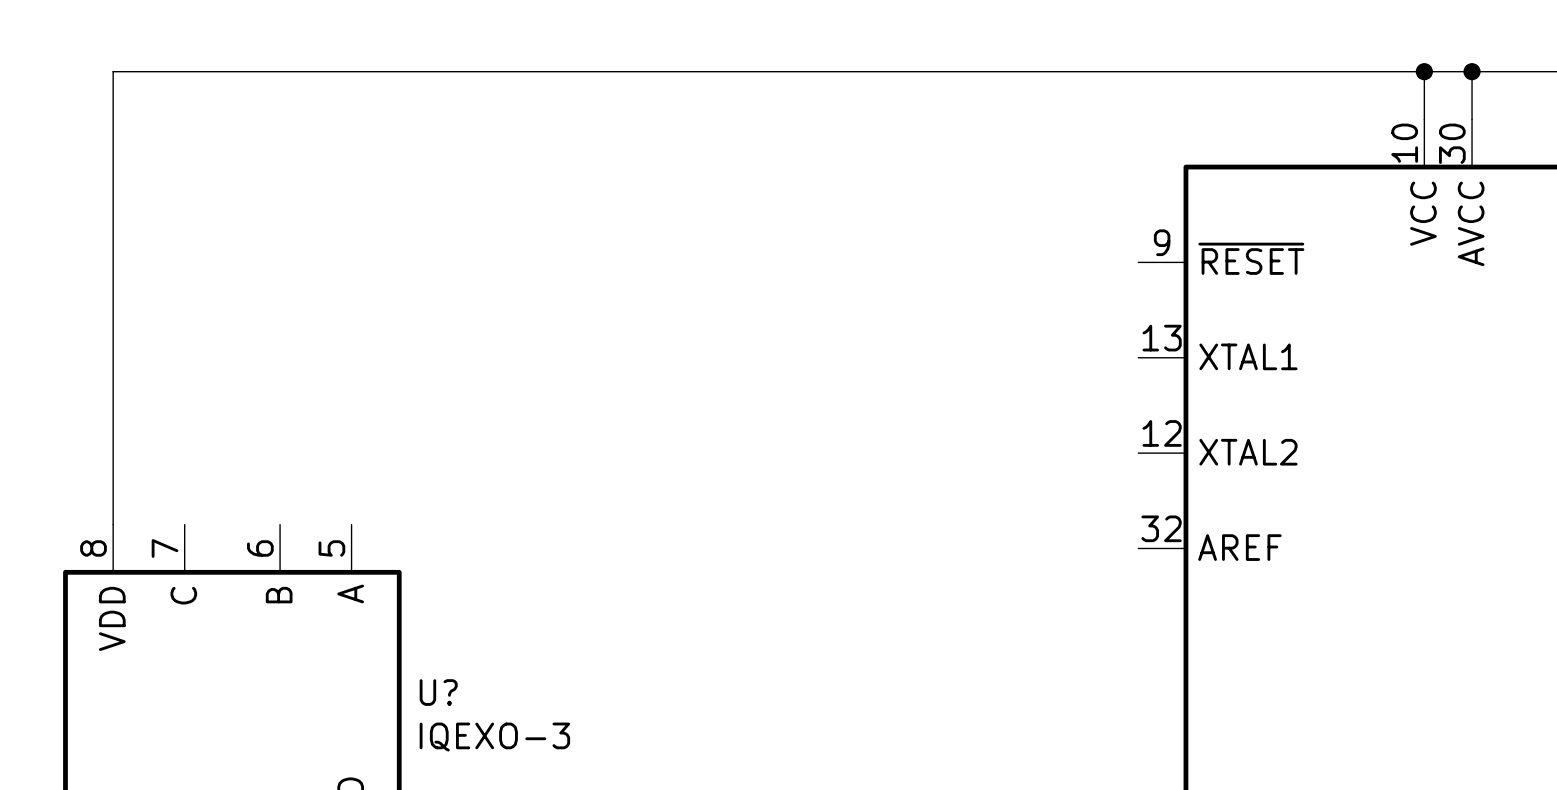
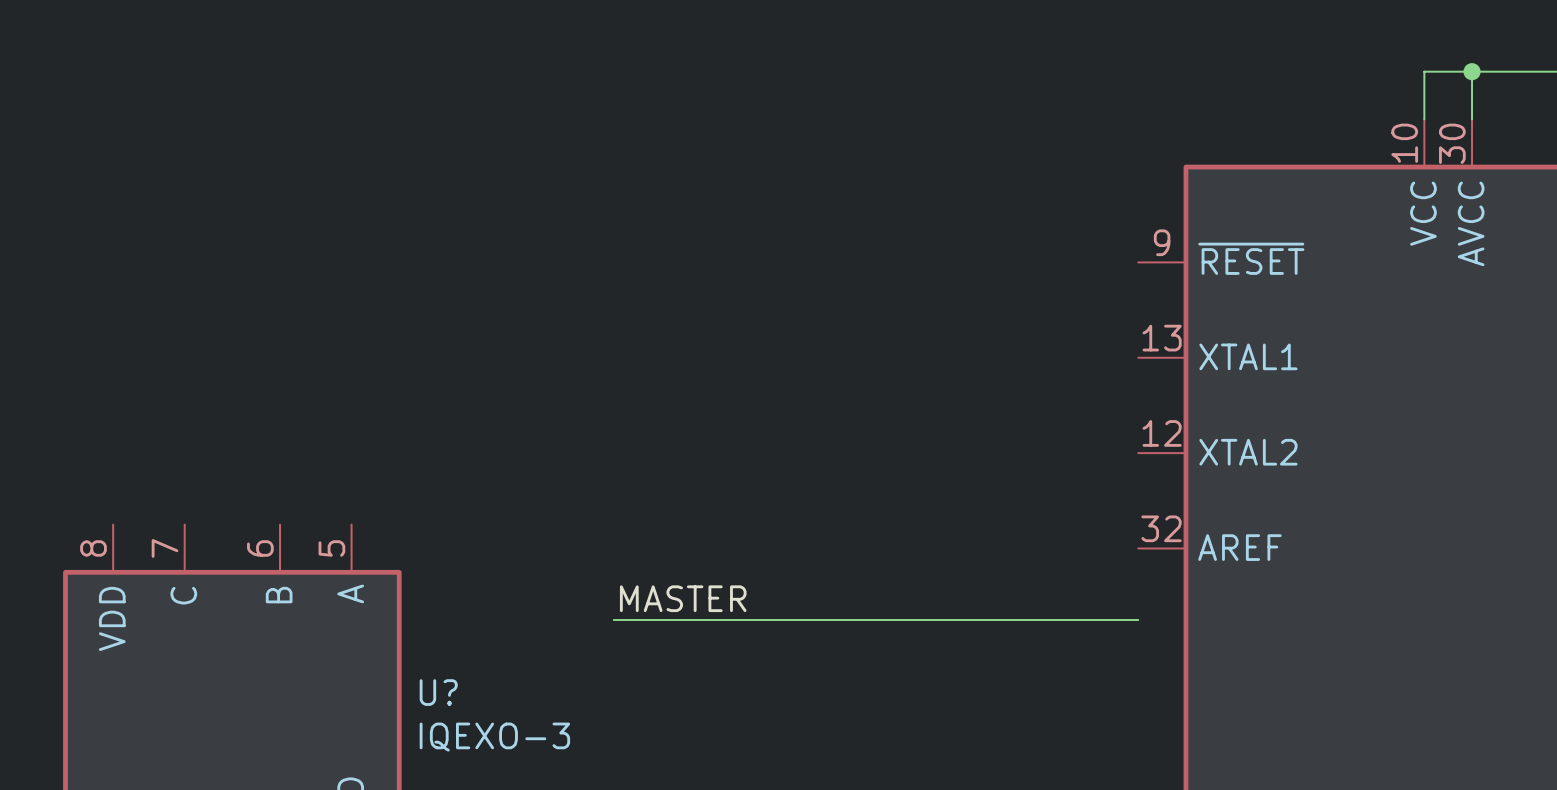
wire: (1424, 71) (113, 71) (113, 524) -> none
junction: (1424, 71) -> none
label: none -> MASTER (683, 598)
wire: none -> (613, 620) (1138, 620)

